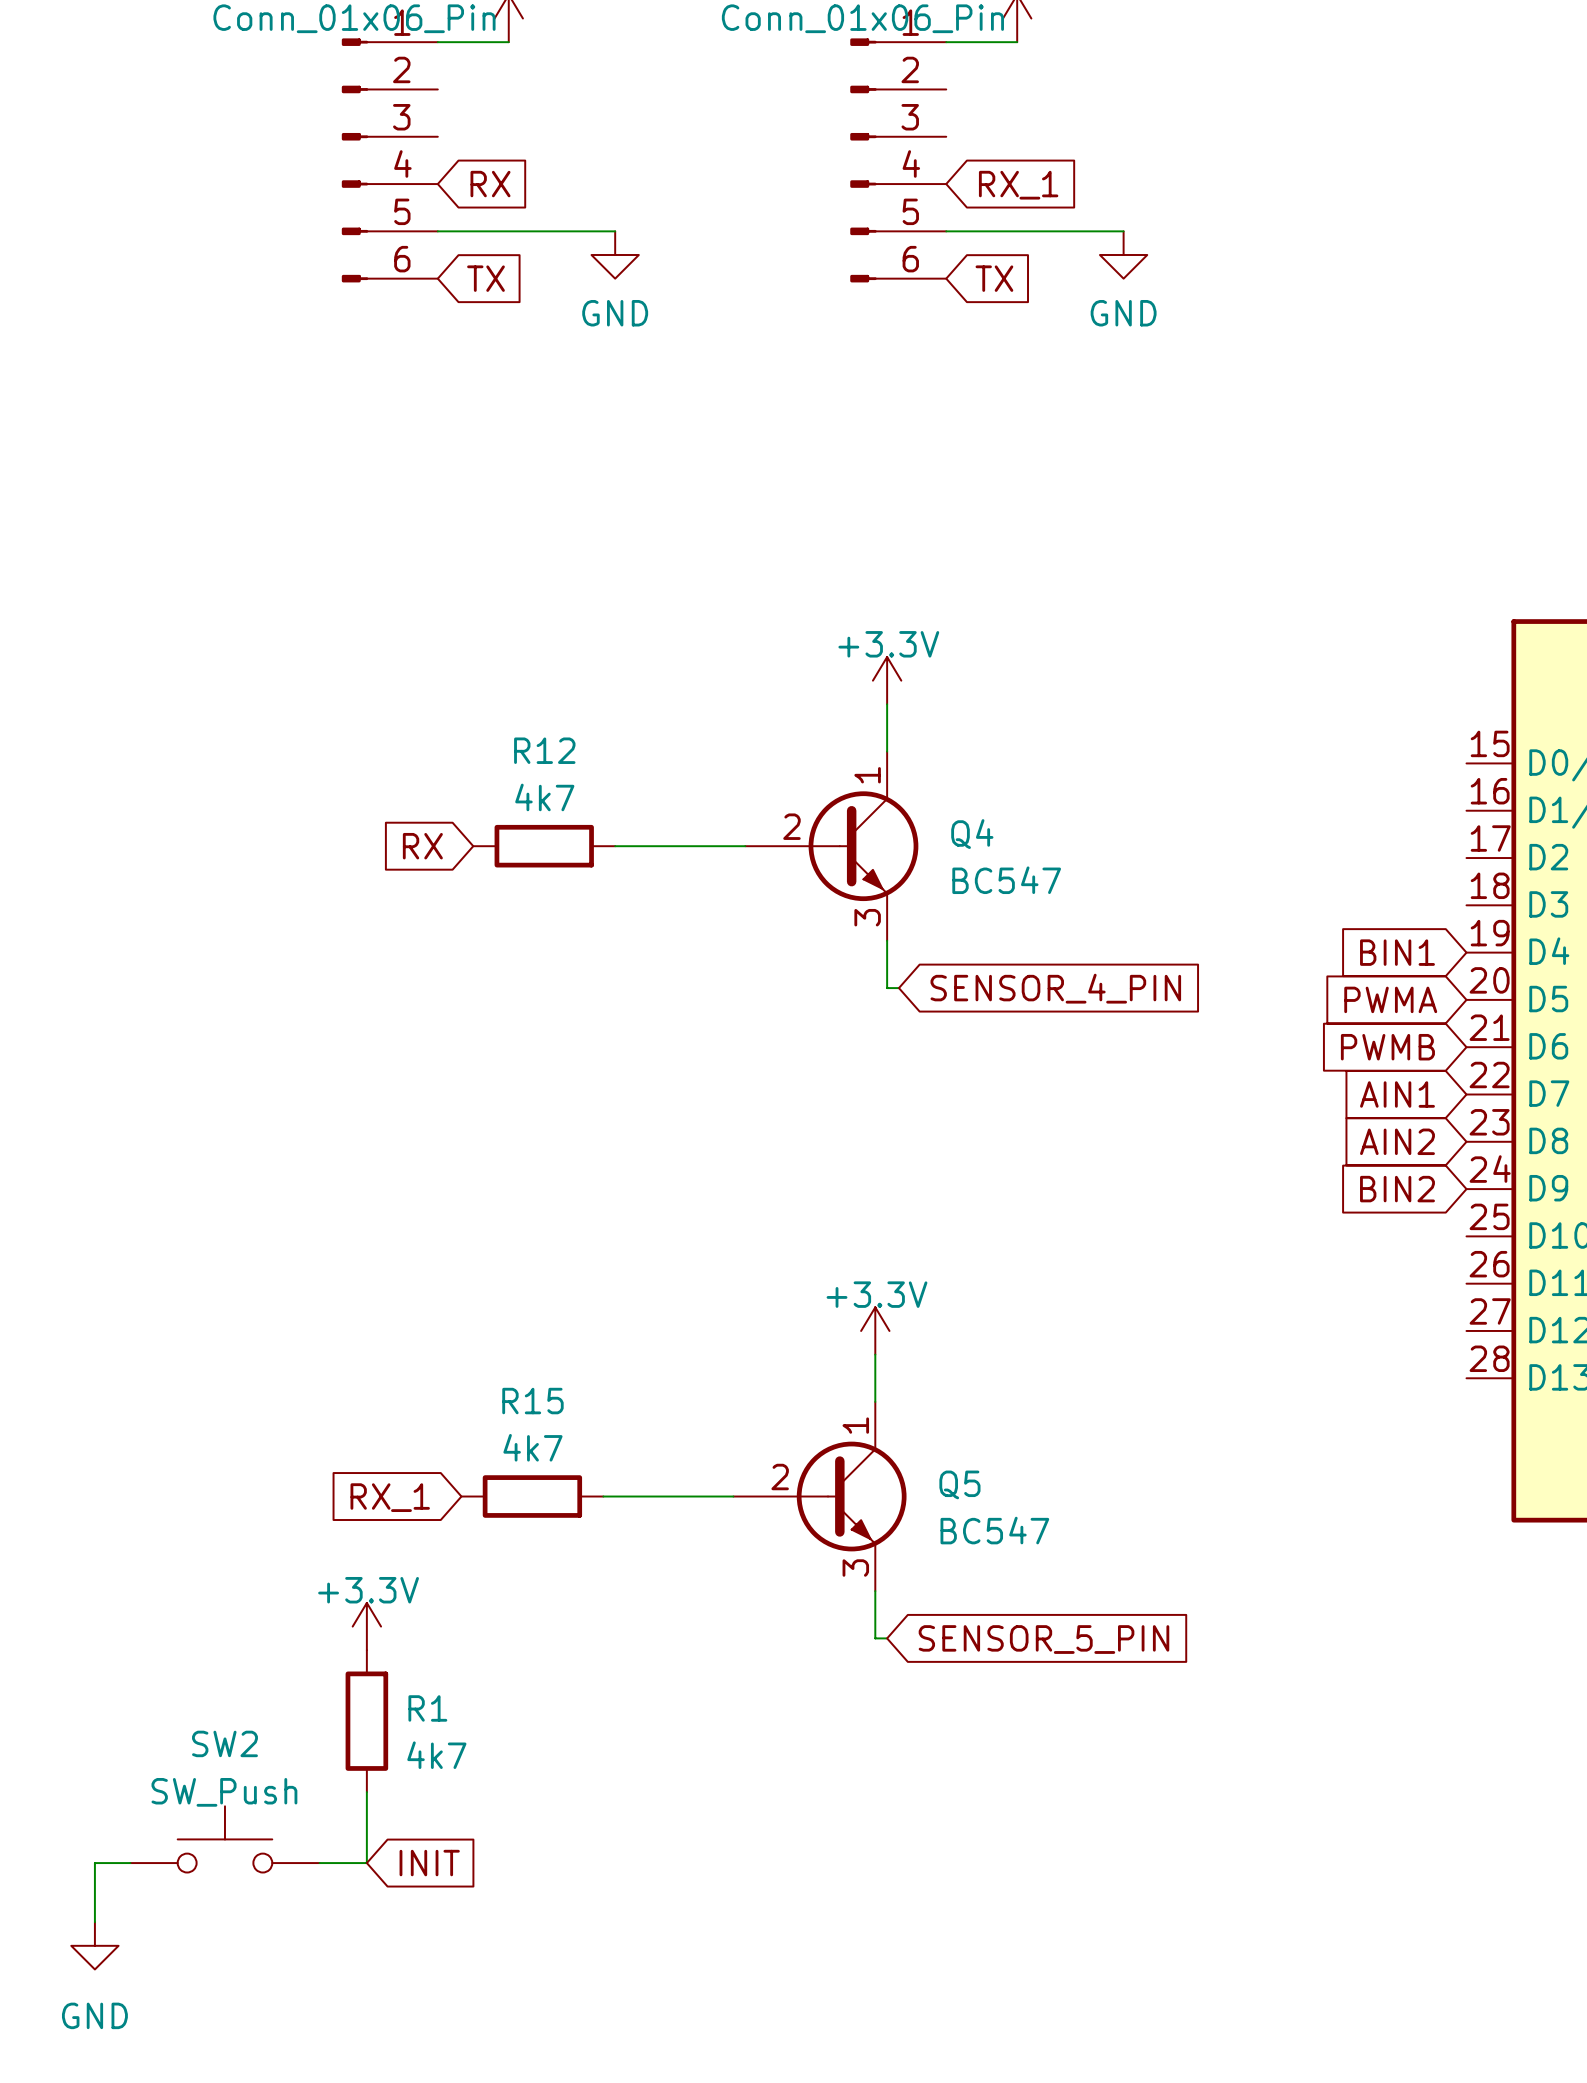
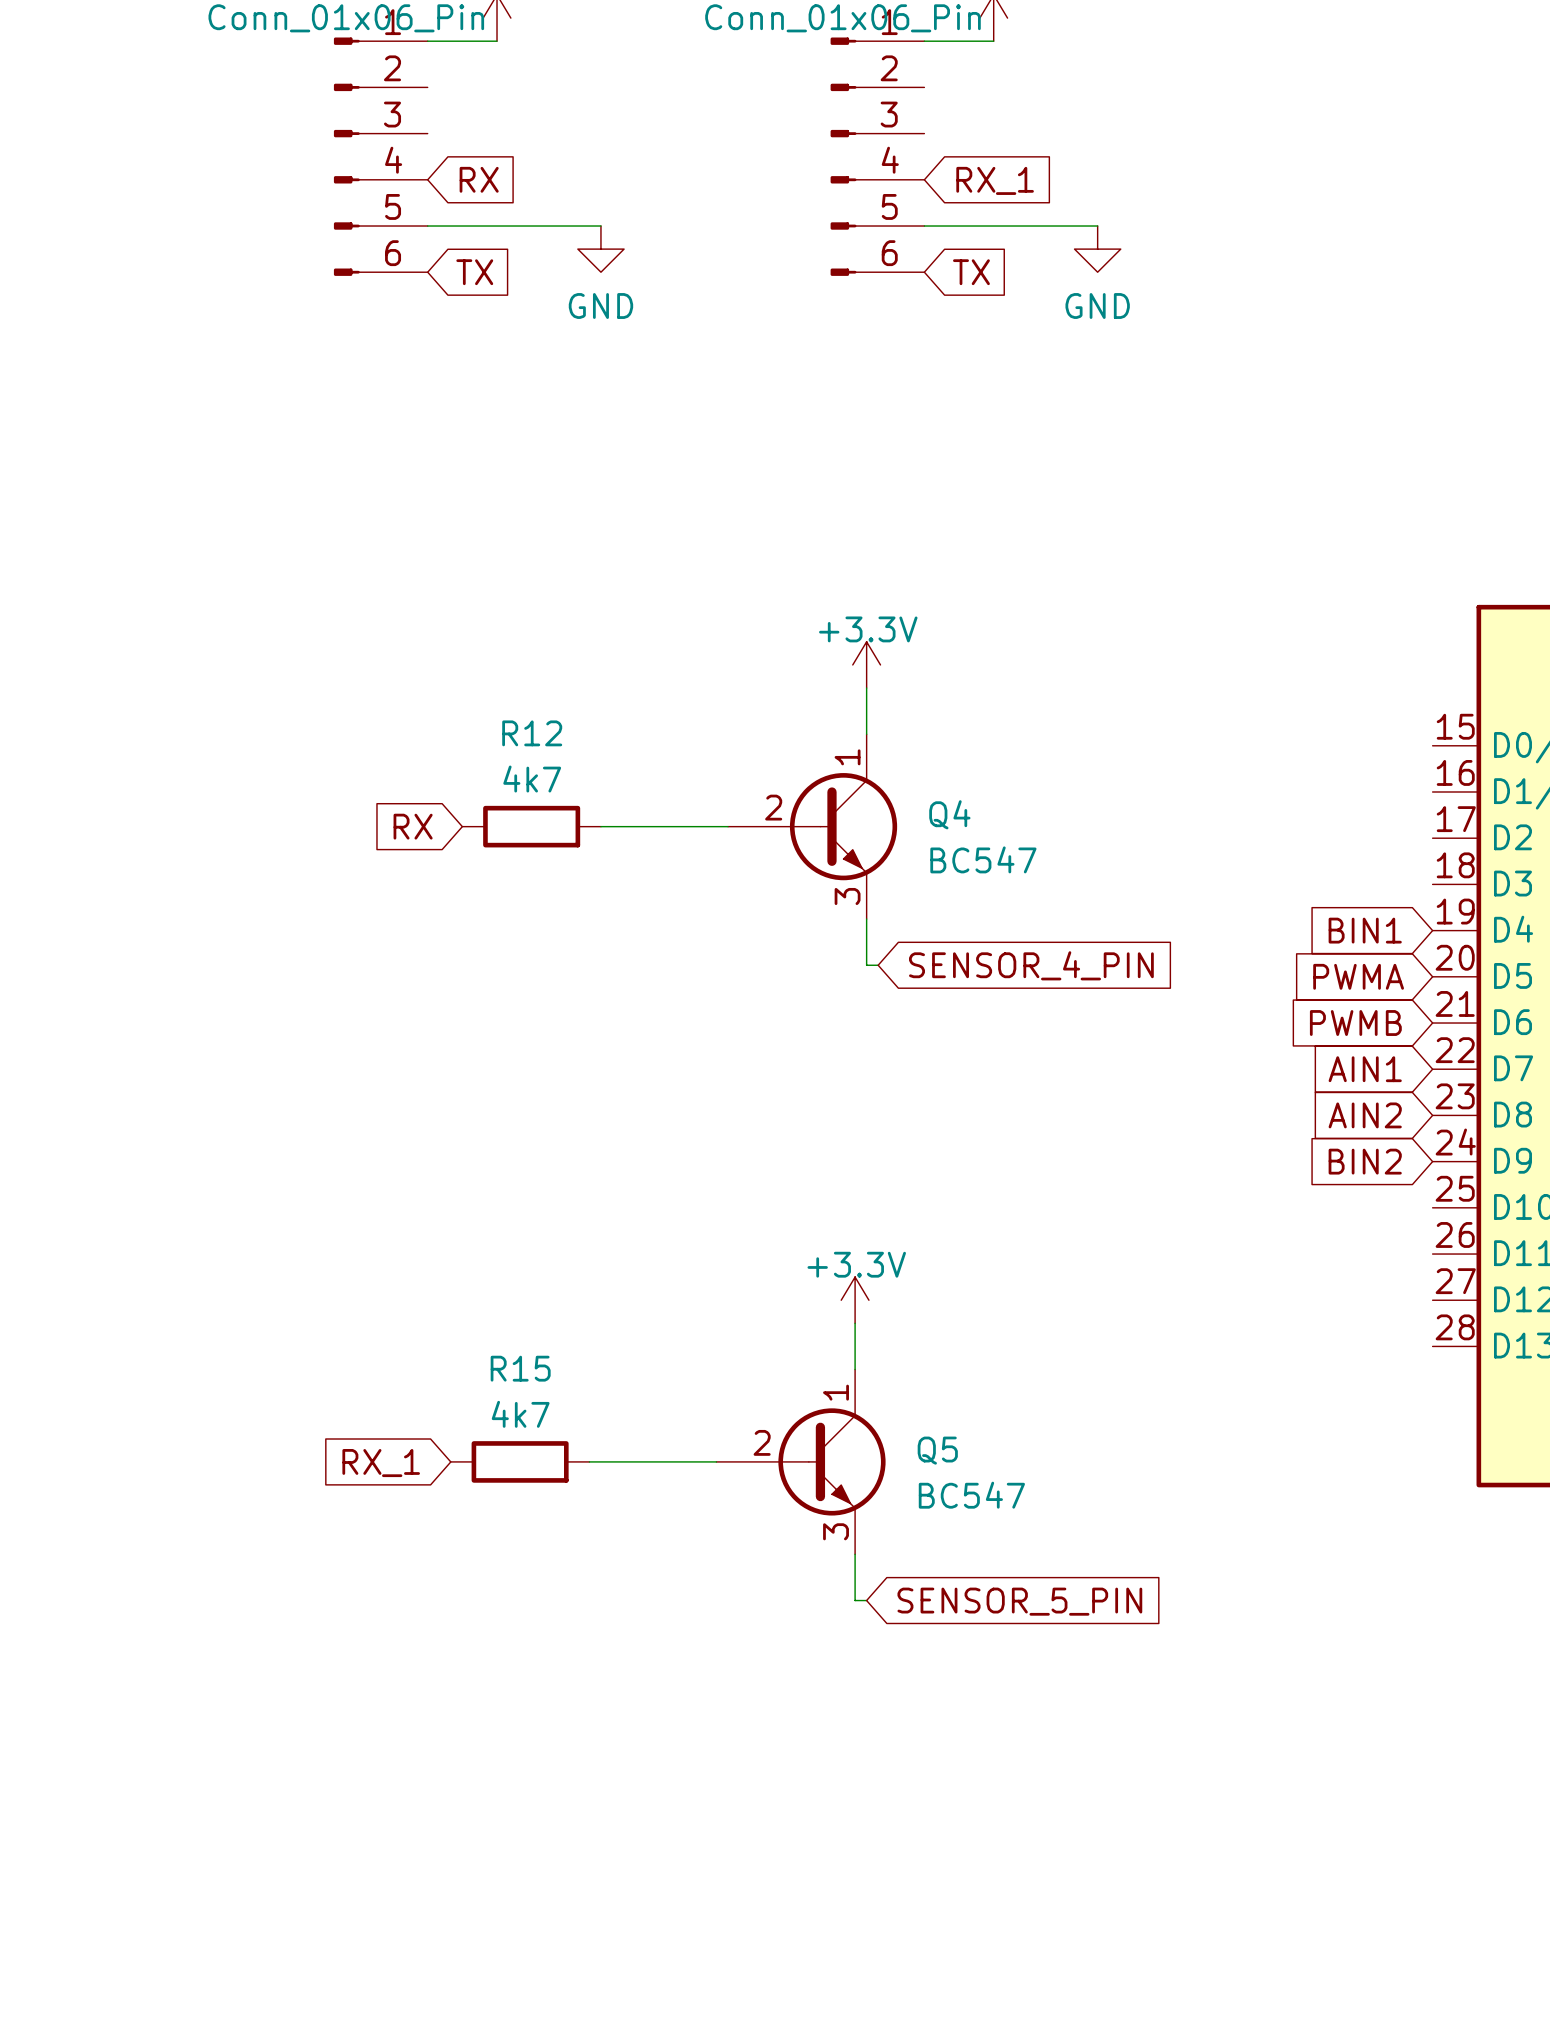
power symbol: +3.3V (366, 1626) -> none
R1: 4k7 (366, 1721) -> none
wire: (366, 1792) (366, 1863) (319, 1863) -> none
SW2: SW_Push (224, 1839) -> none
wire: (130, 1863) (94, 1863) (94, 1922) -> none
global label: INIT (429, 1863) -> none
power symbol: GND (94, 1945) -> none

